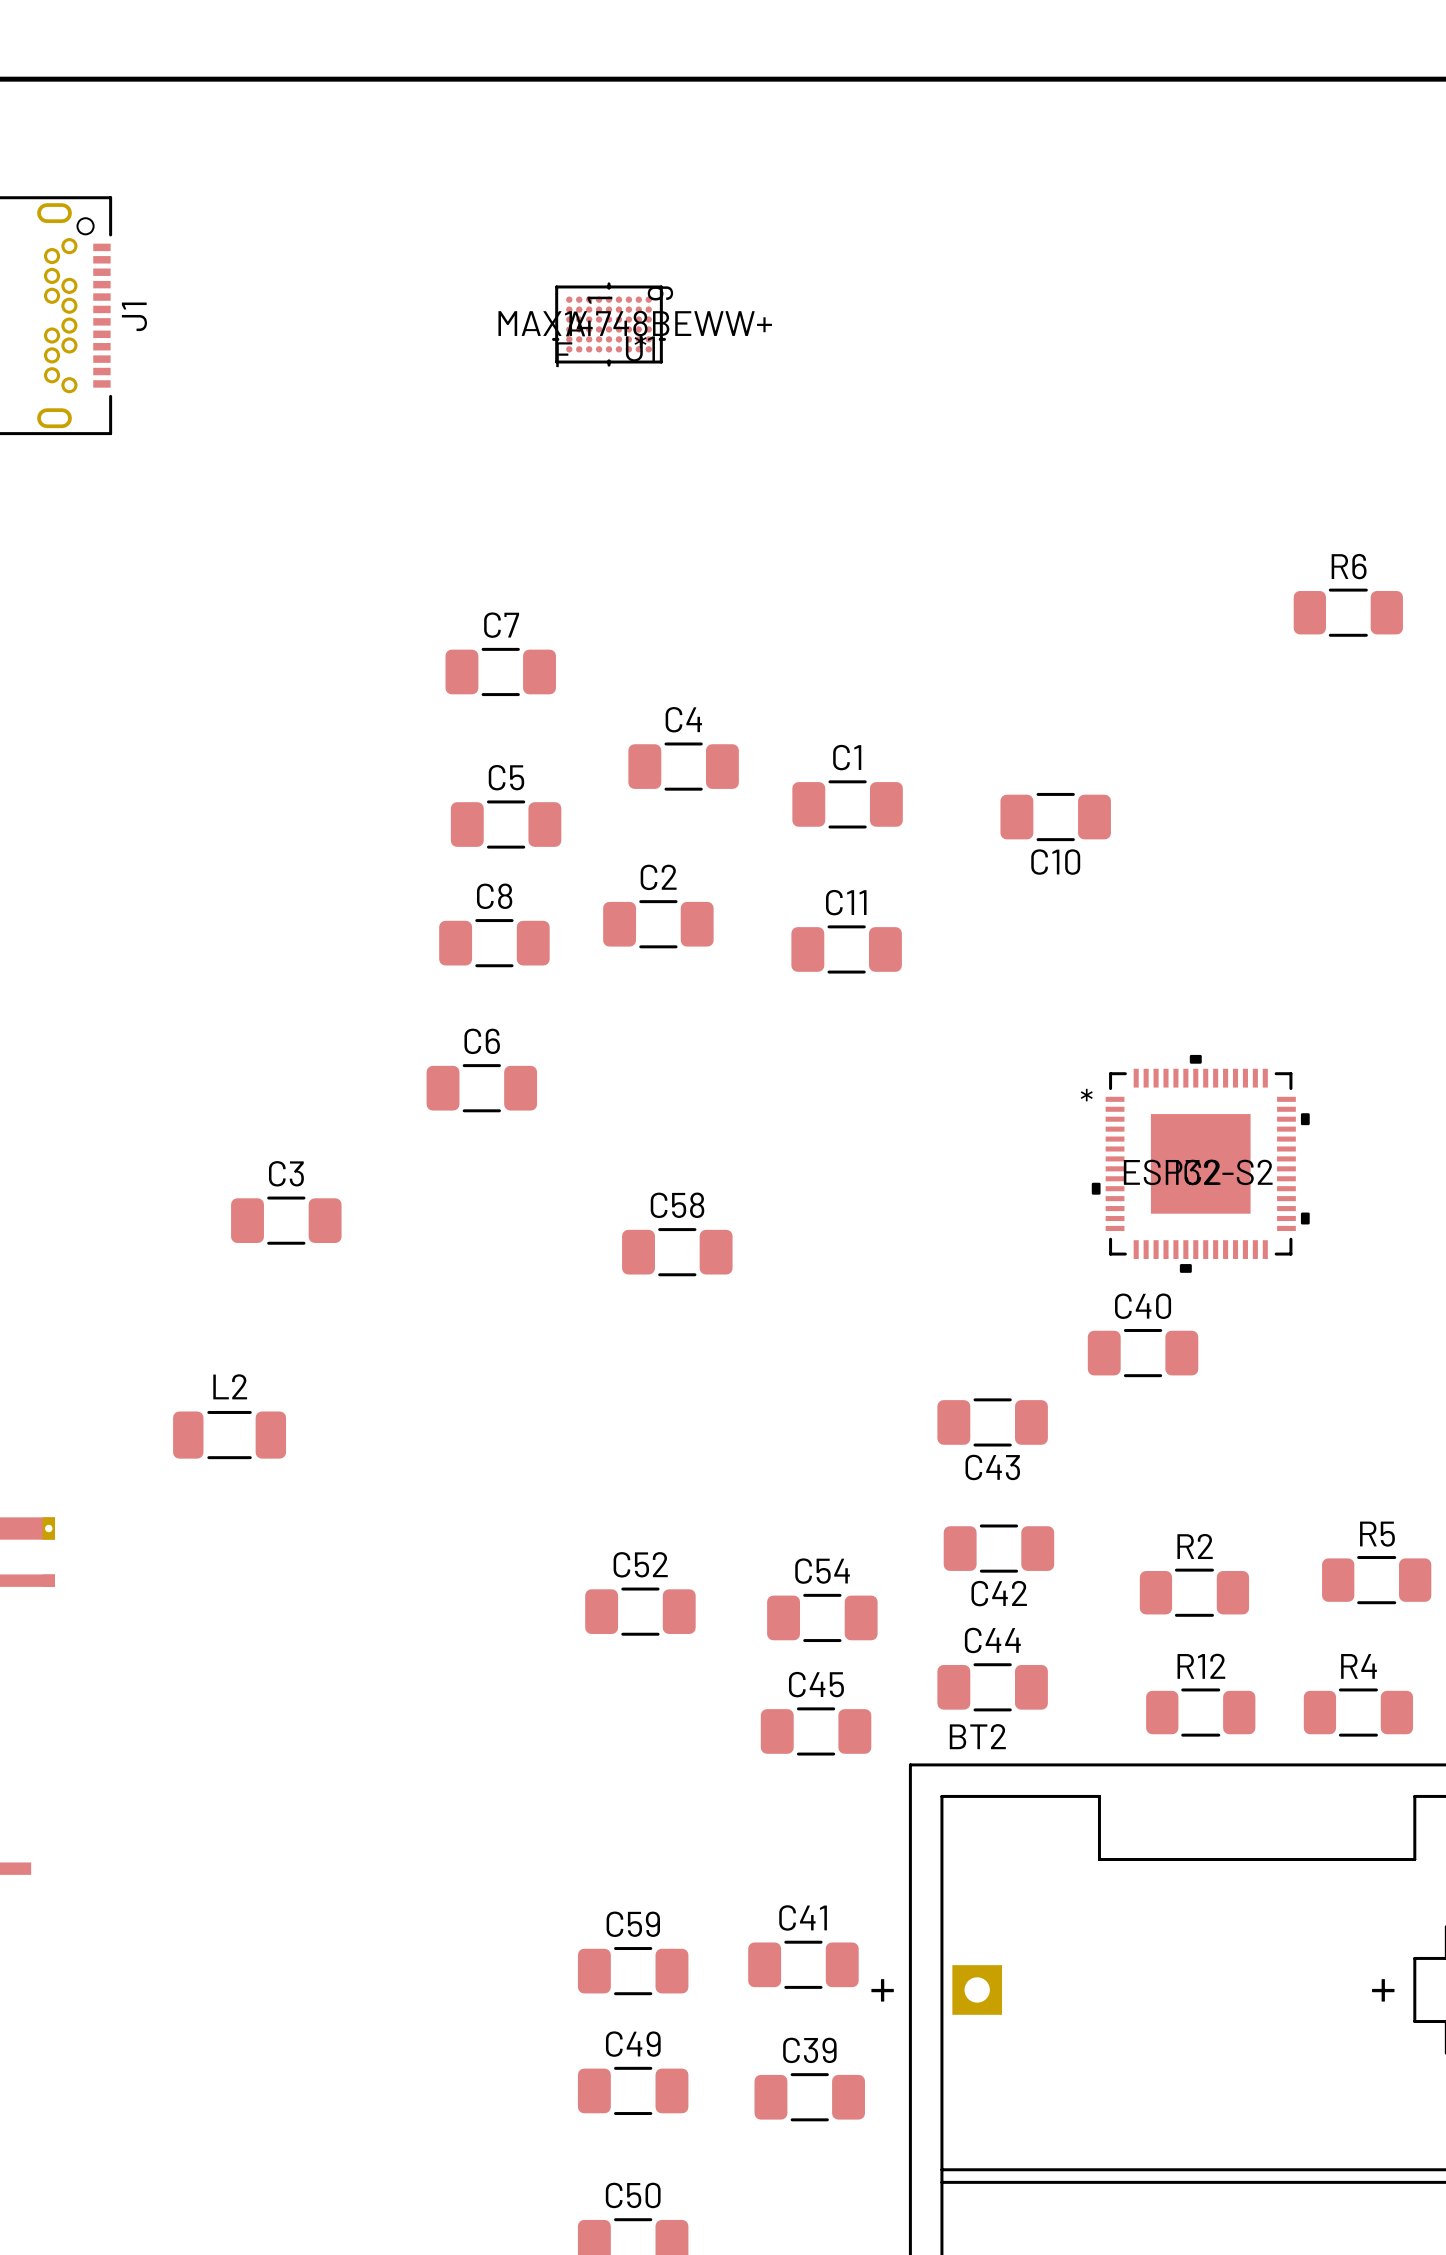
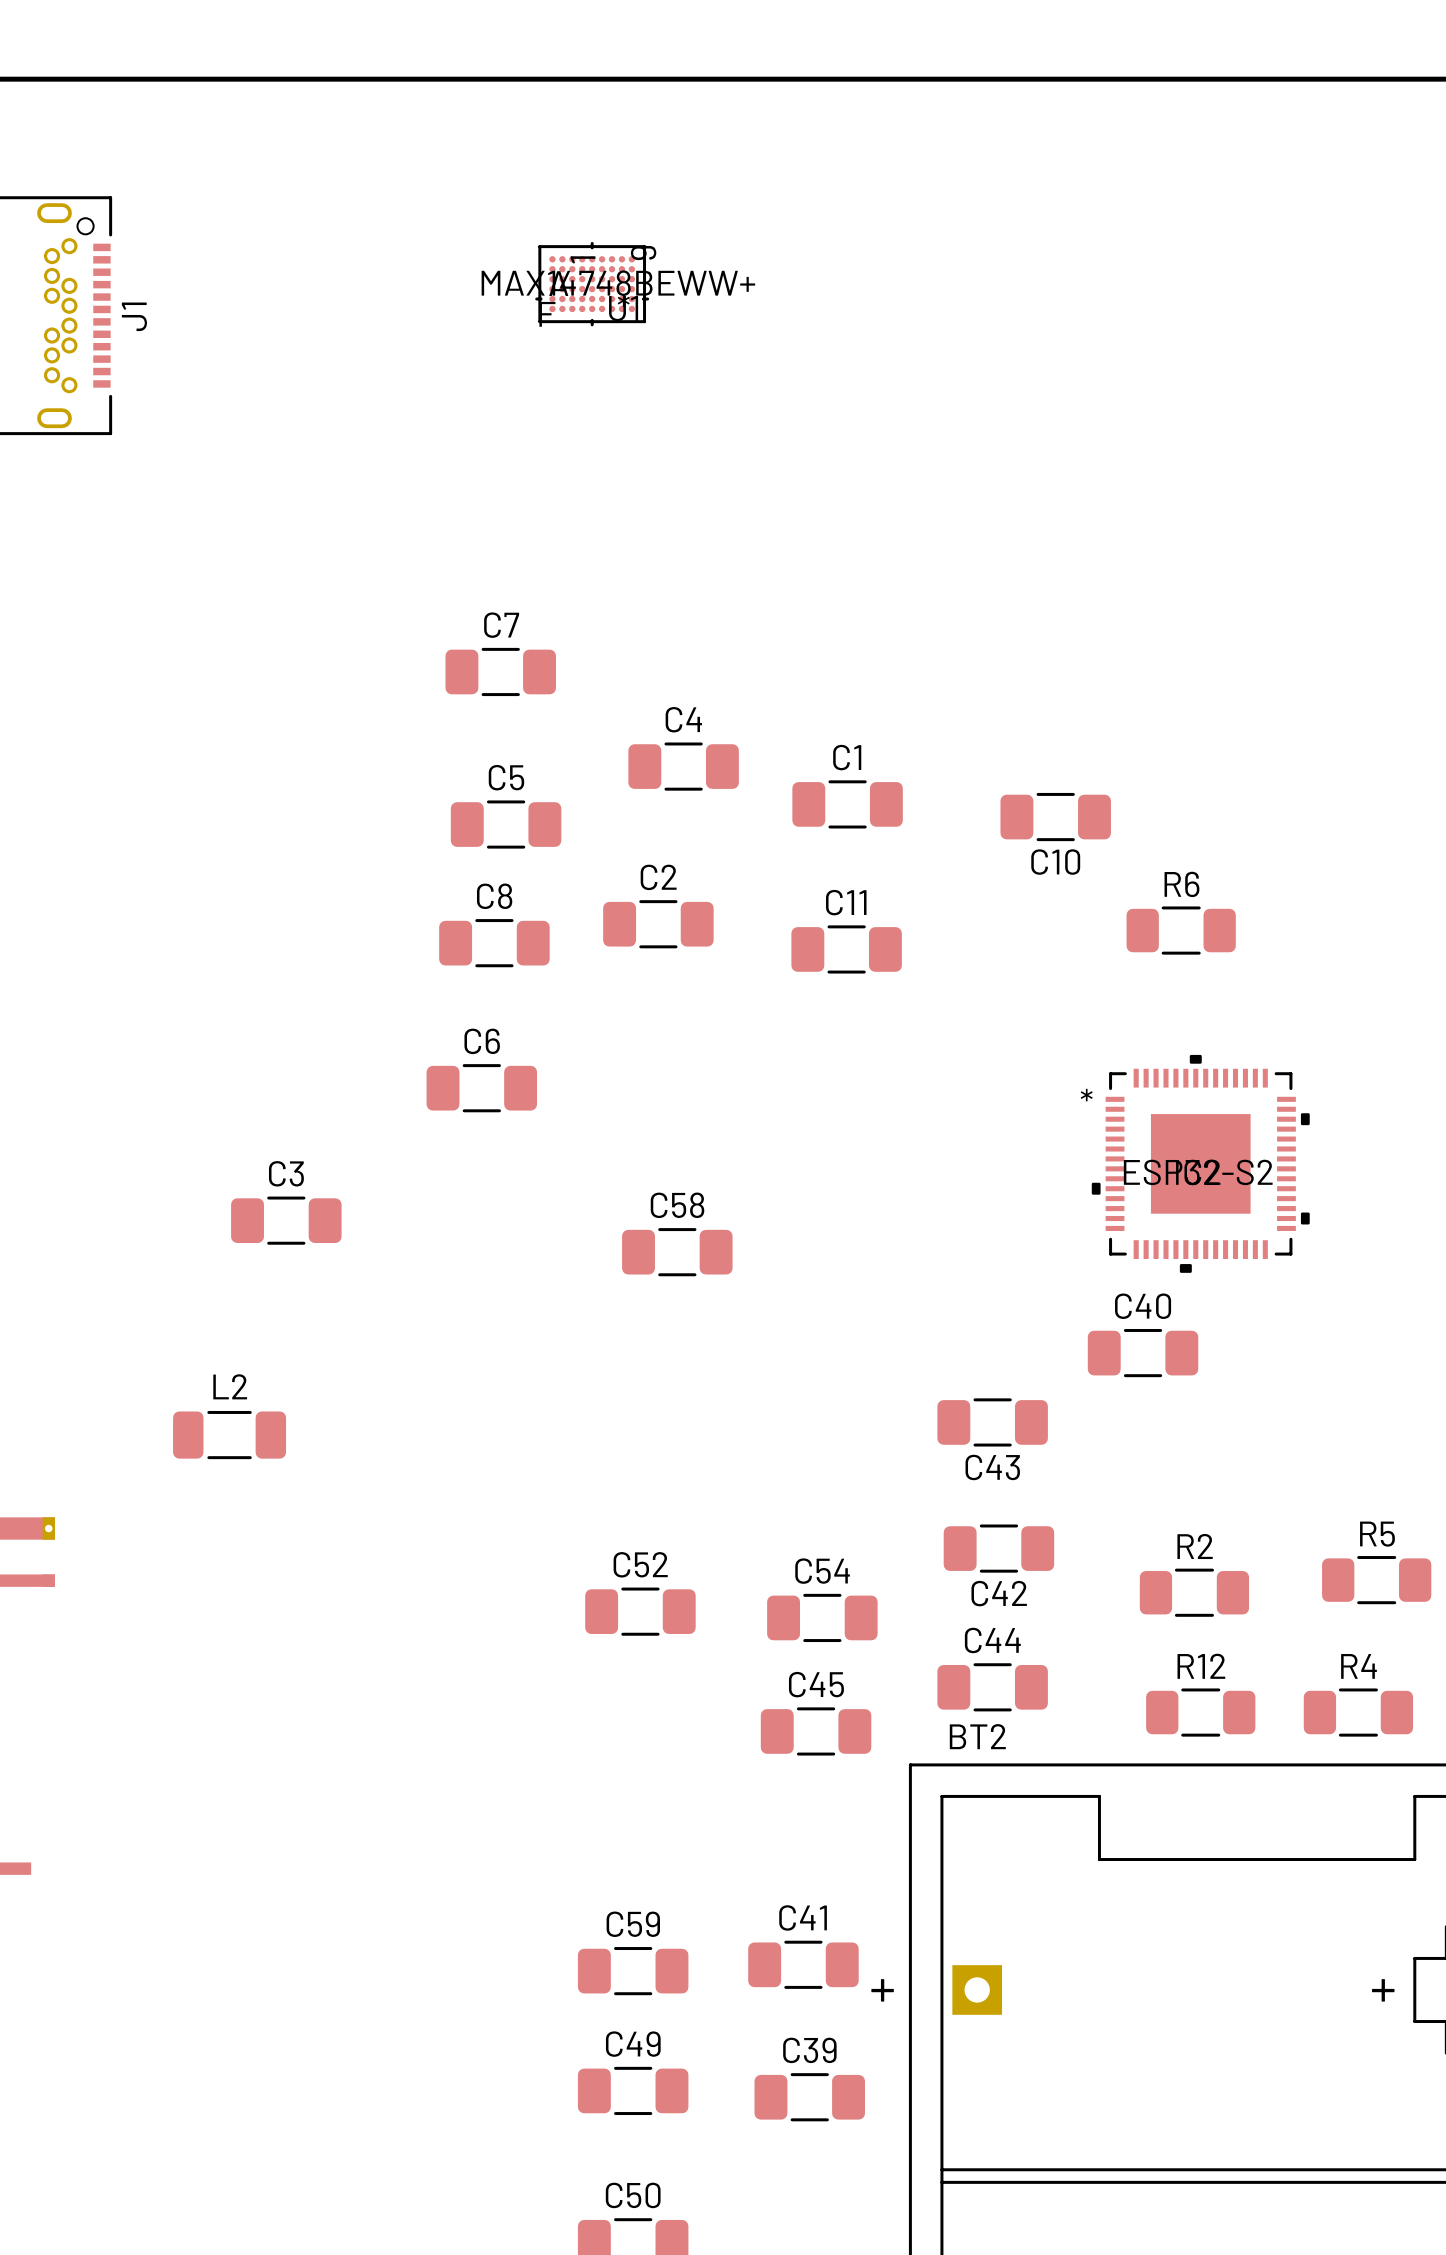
U1 position: (609, 324) -> (592, 284)
R6 position: (1348, 612) -> (1181, 930)

